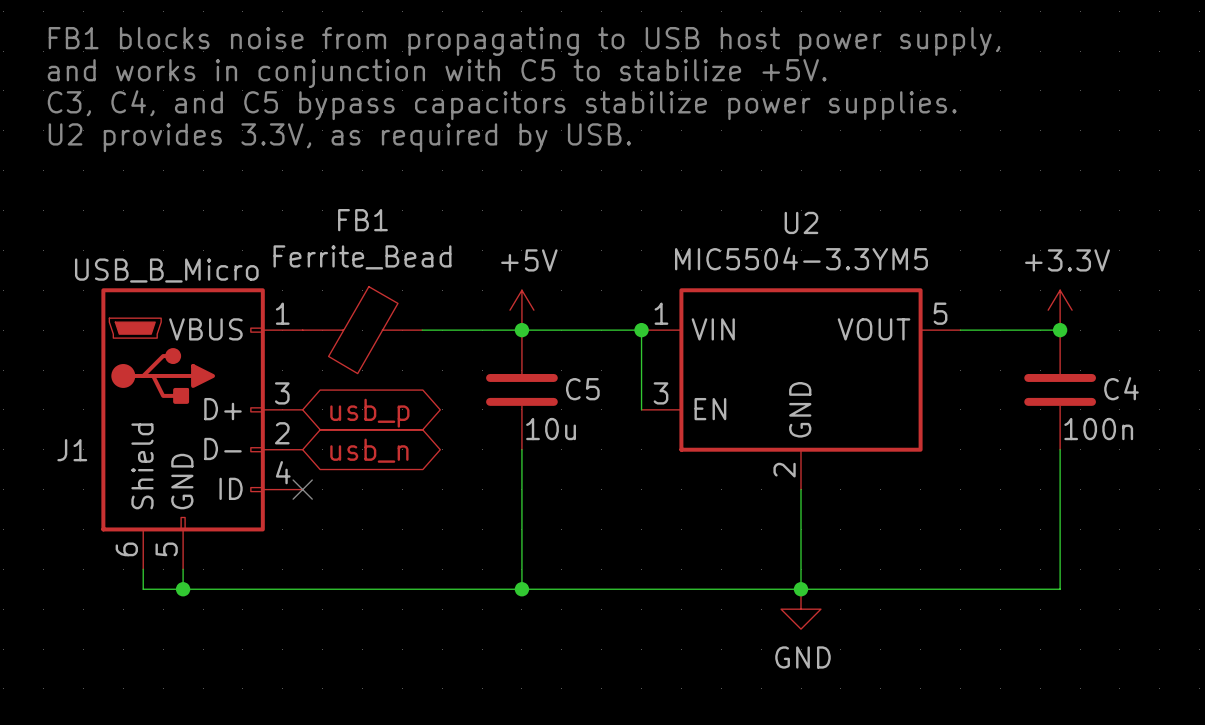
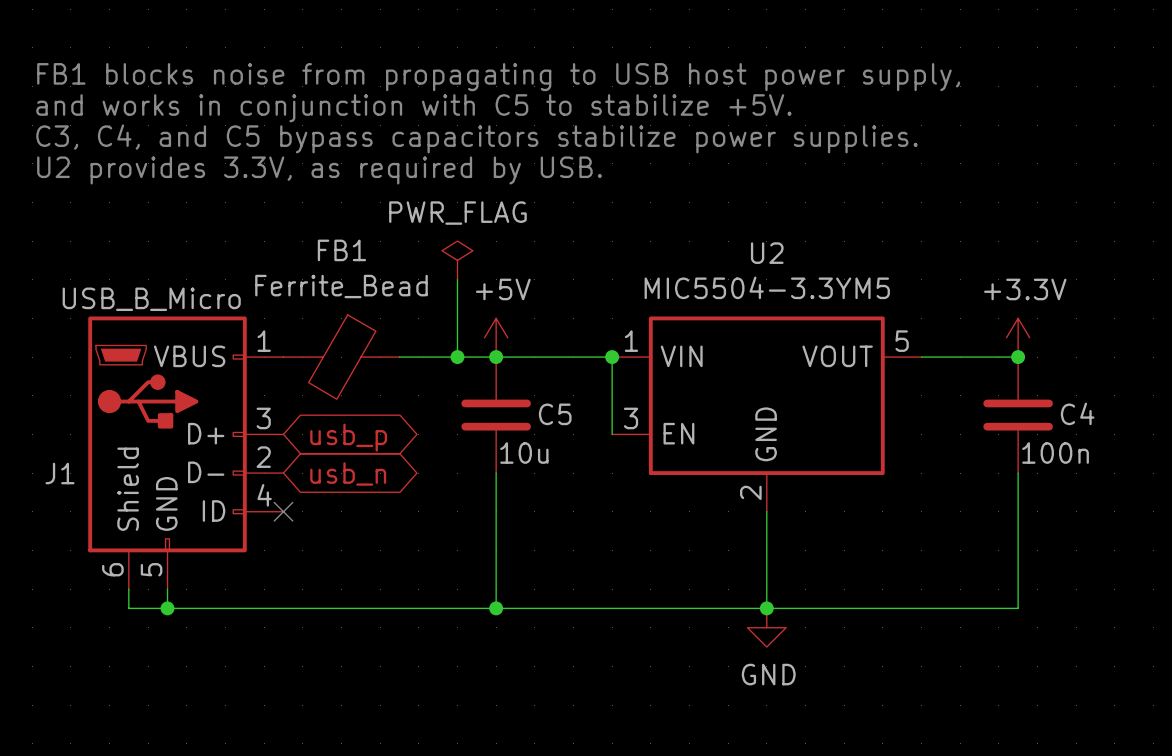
power symbol: none -> PWR_FLAG (457, 260)
wire: none -> (457, 279) (457, 357)
junction: none -> (457, 357)

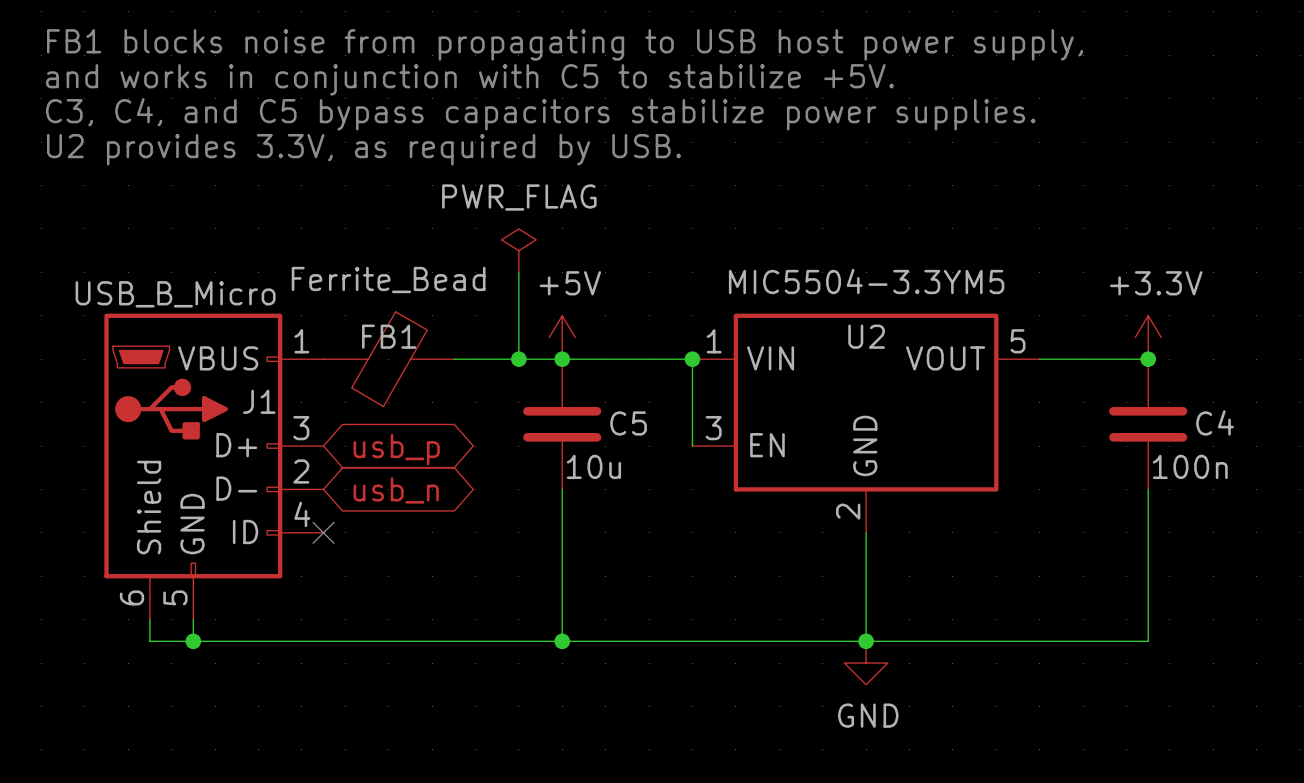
FB1 name position: FB1 (341, 250) -> FB1 (389, 336)
U2 name position: U2 (767, 253) -> U2 (866, 336)
J1 name position: J1 (60, 473) -> J1 (259, 401)

